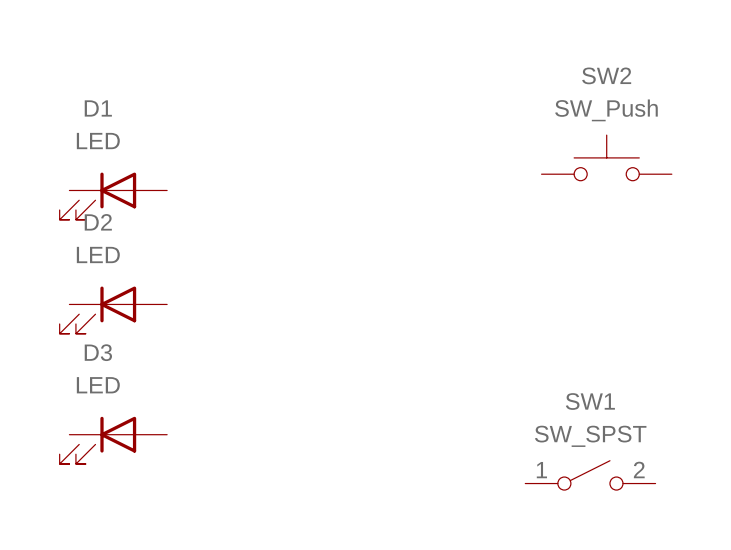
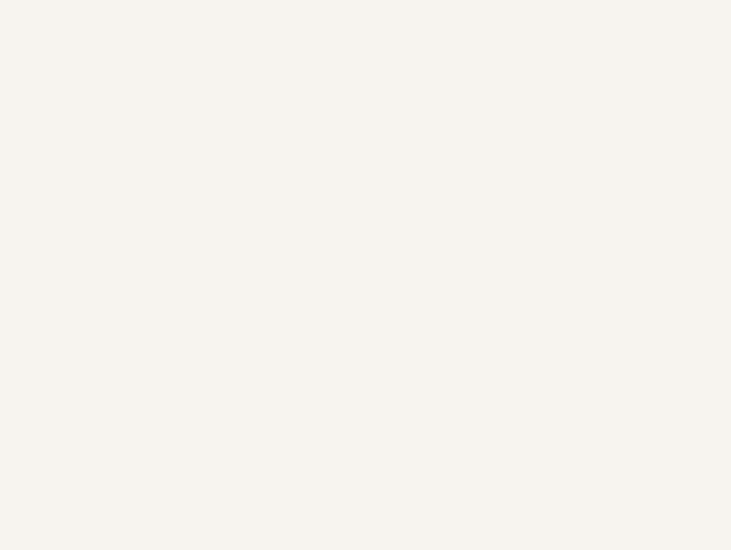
SW2: SW_Push (606, 157) -> none
D1: LED (113, 196) -> none
D2: LED (113, 310) -> none
D3: LED (113, 440) -> none
SW1: SW_SPST (590, 475) -> none

